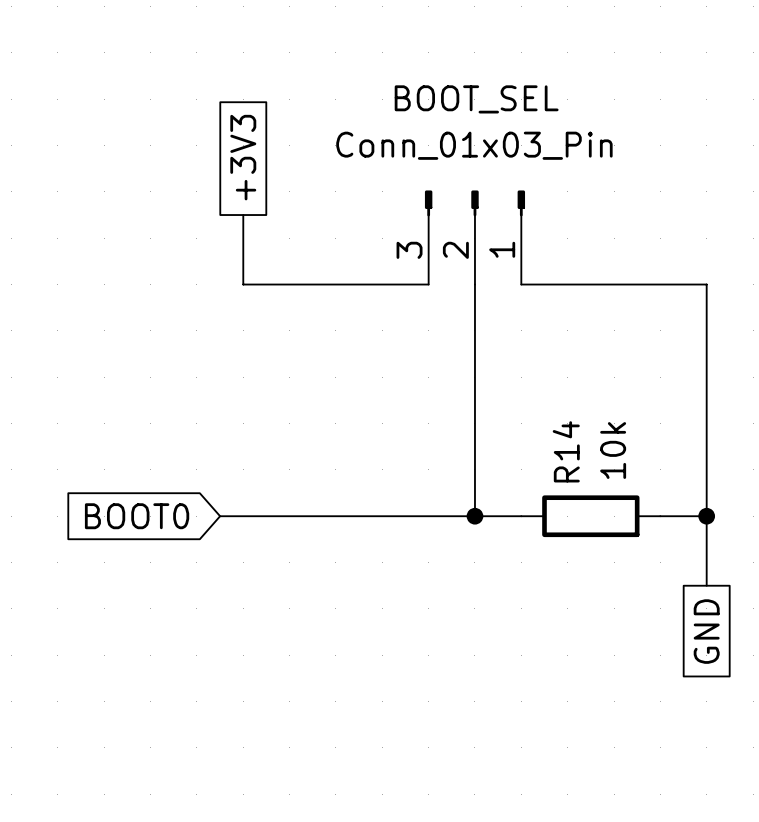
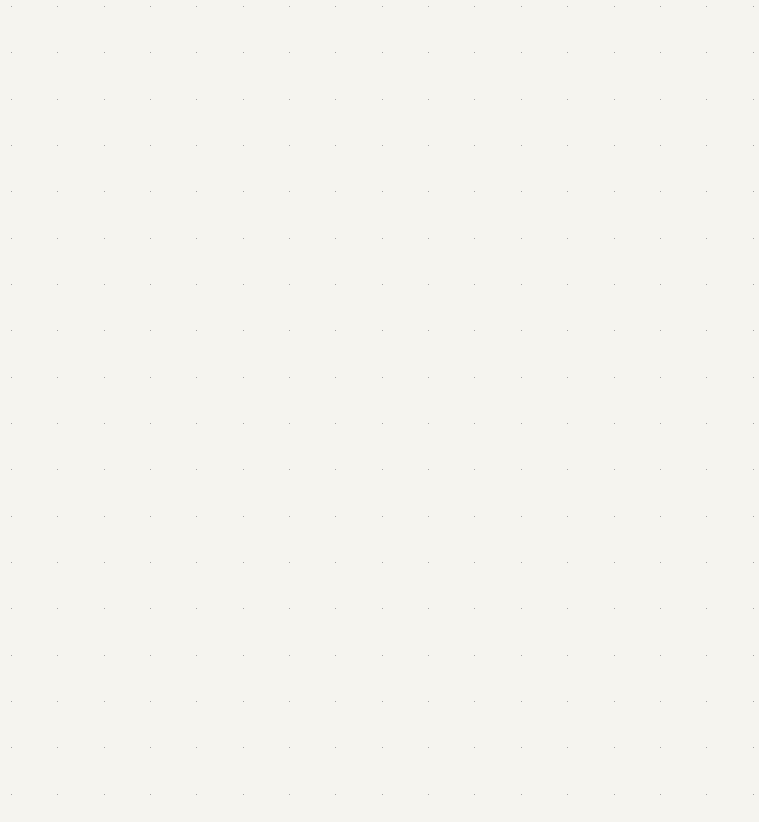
global label: +3V3 (243, 157) -> none
wire: (243, 215) (243, 284) (428, 284) -> none
BOOT_SEL: Conn_01x03_Pin (474, 237) -> none
wire: (474, 284) (474, 516) -> none
wire: (521, 284) (706, 284) (706, 585) -> none
global label: BOOT0 (137, 516) -> none
wire: (220, 516) (521, 516) -> none
junction: (474, 516) -> none
R14: 10k (590, 516) -> none
wire: (660, 516) (706, 516) -> none
junction: (706, 516) -> none
global label: GND (706, 631) -> none

